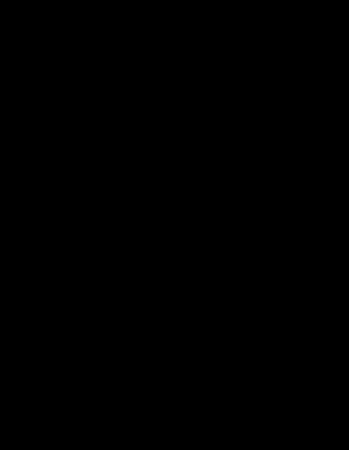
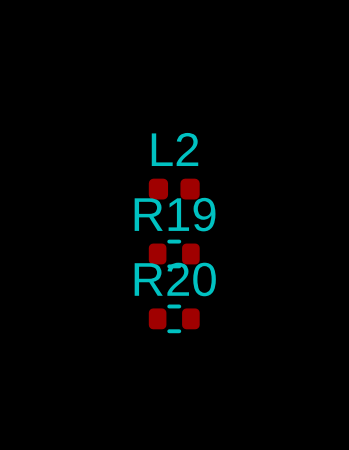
L2: none -> (174, 189)
R19: none -> (174, 253)
R20: none -> (174, 318)

